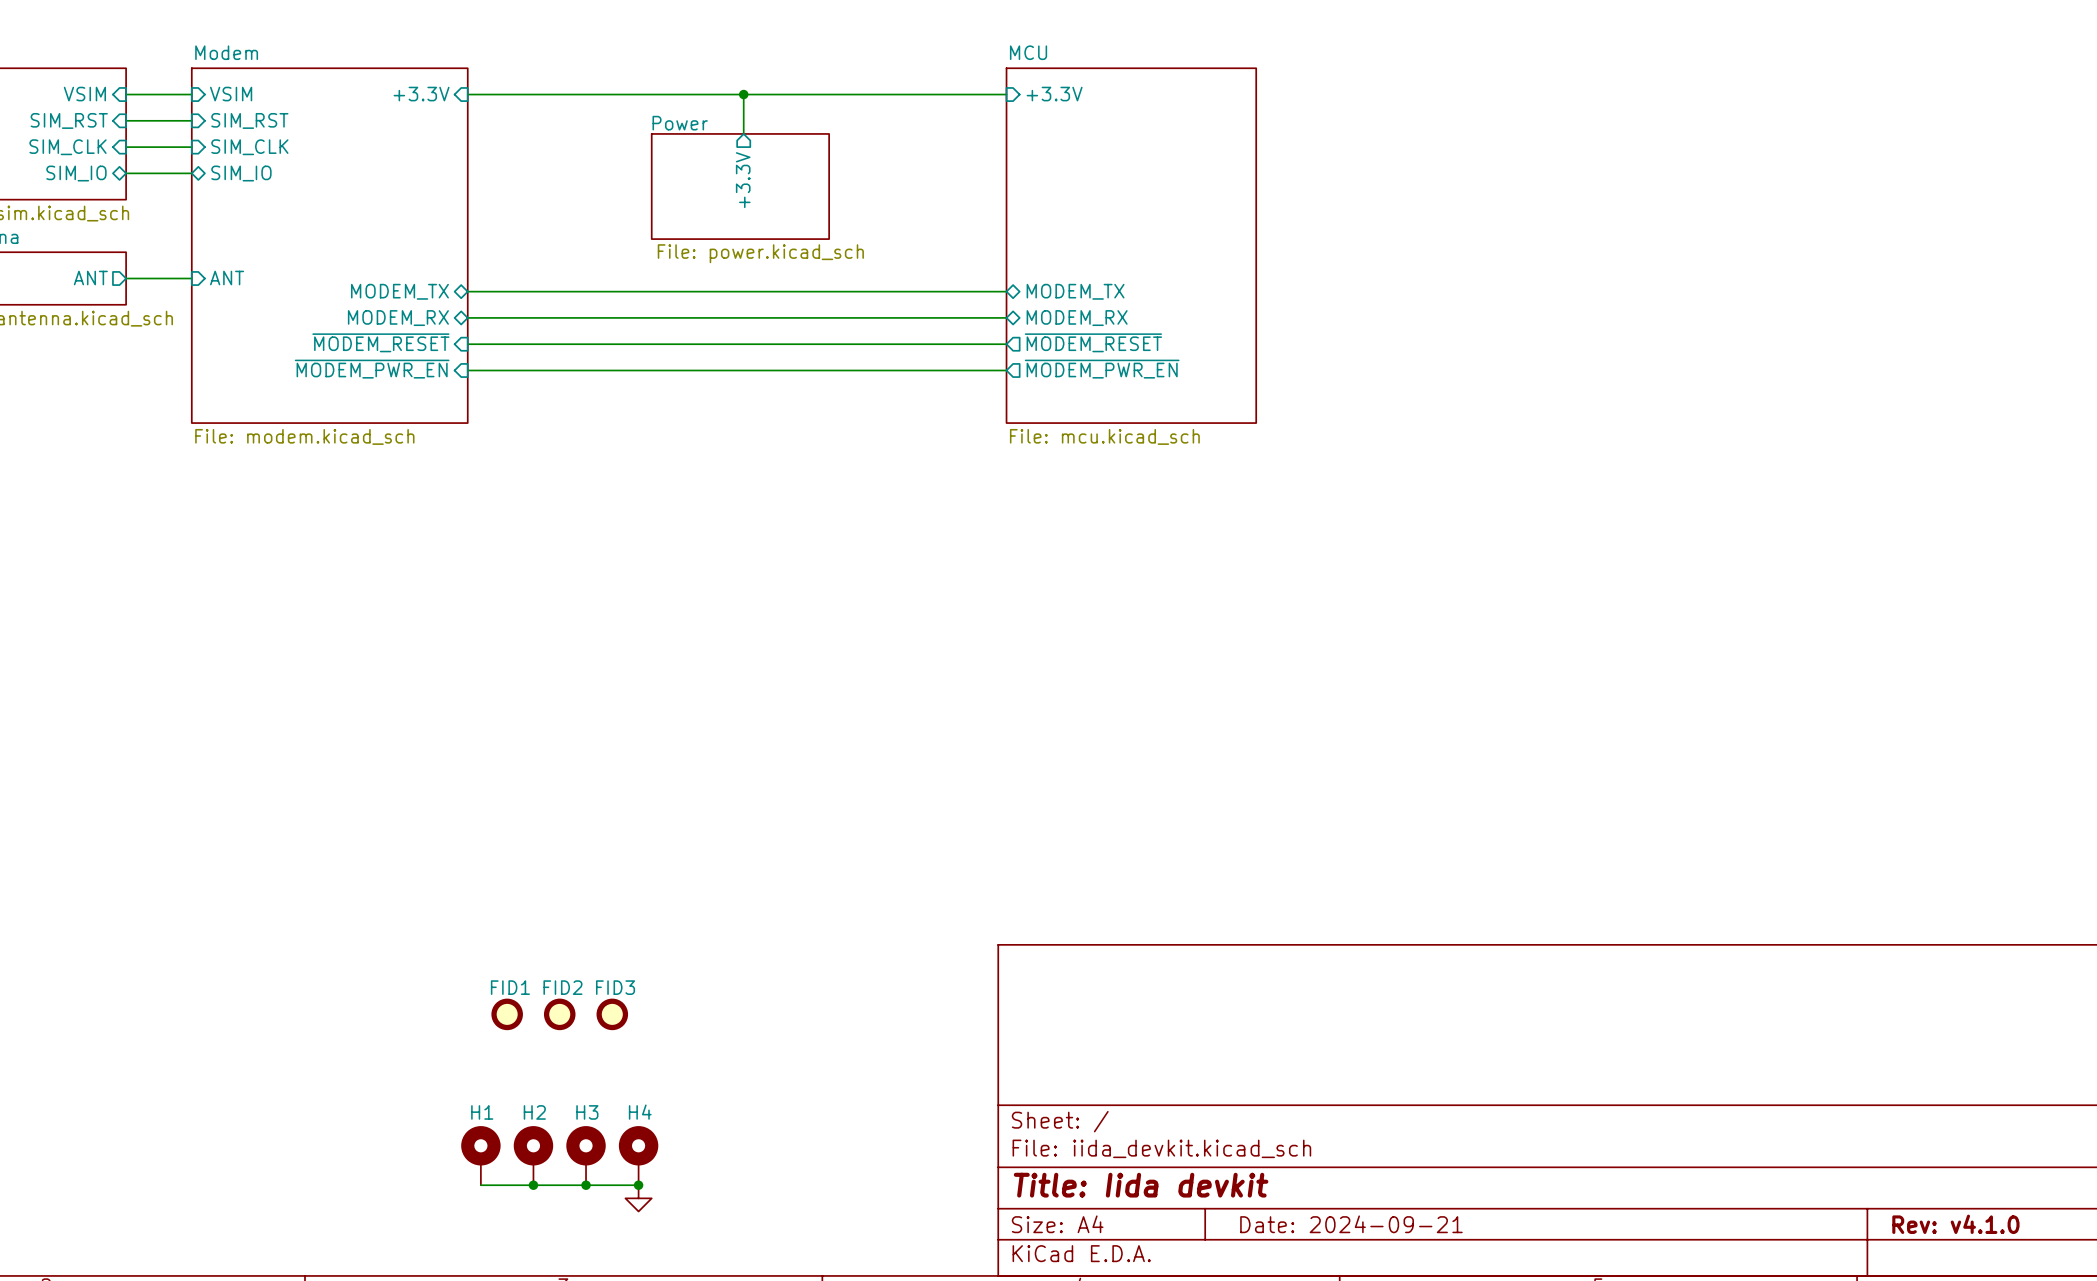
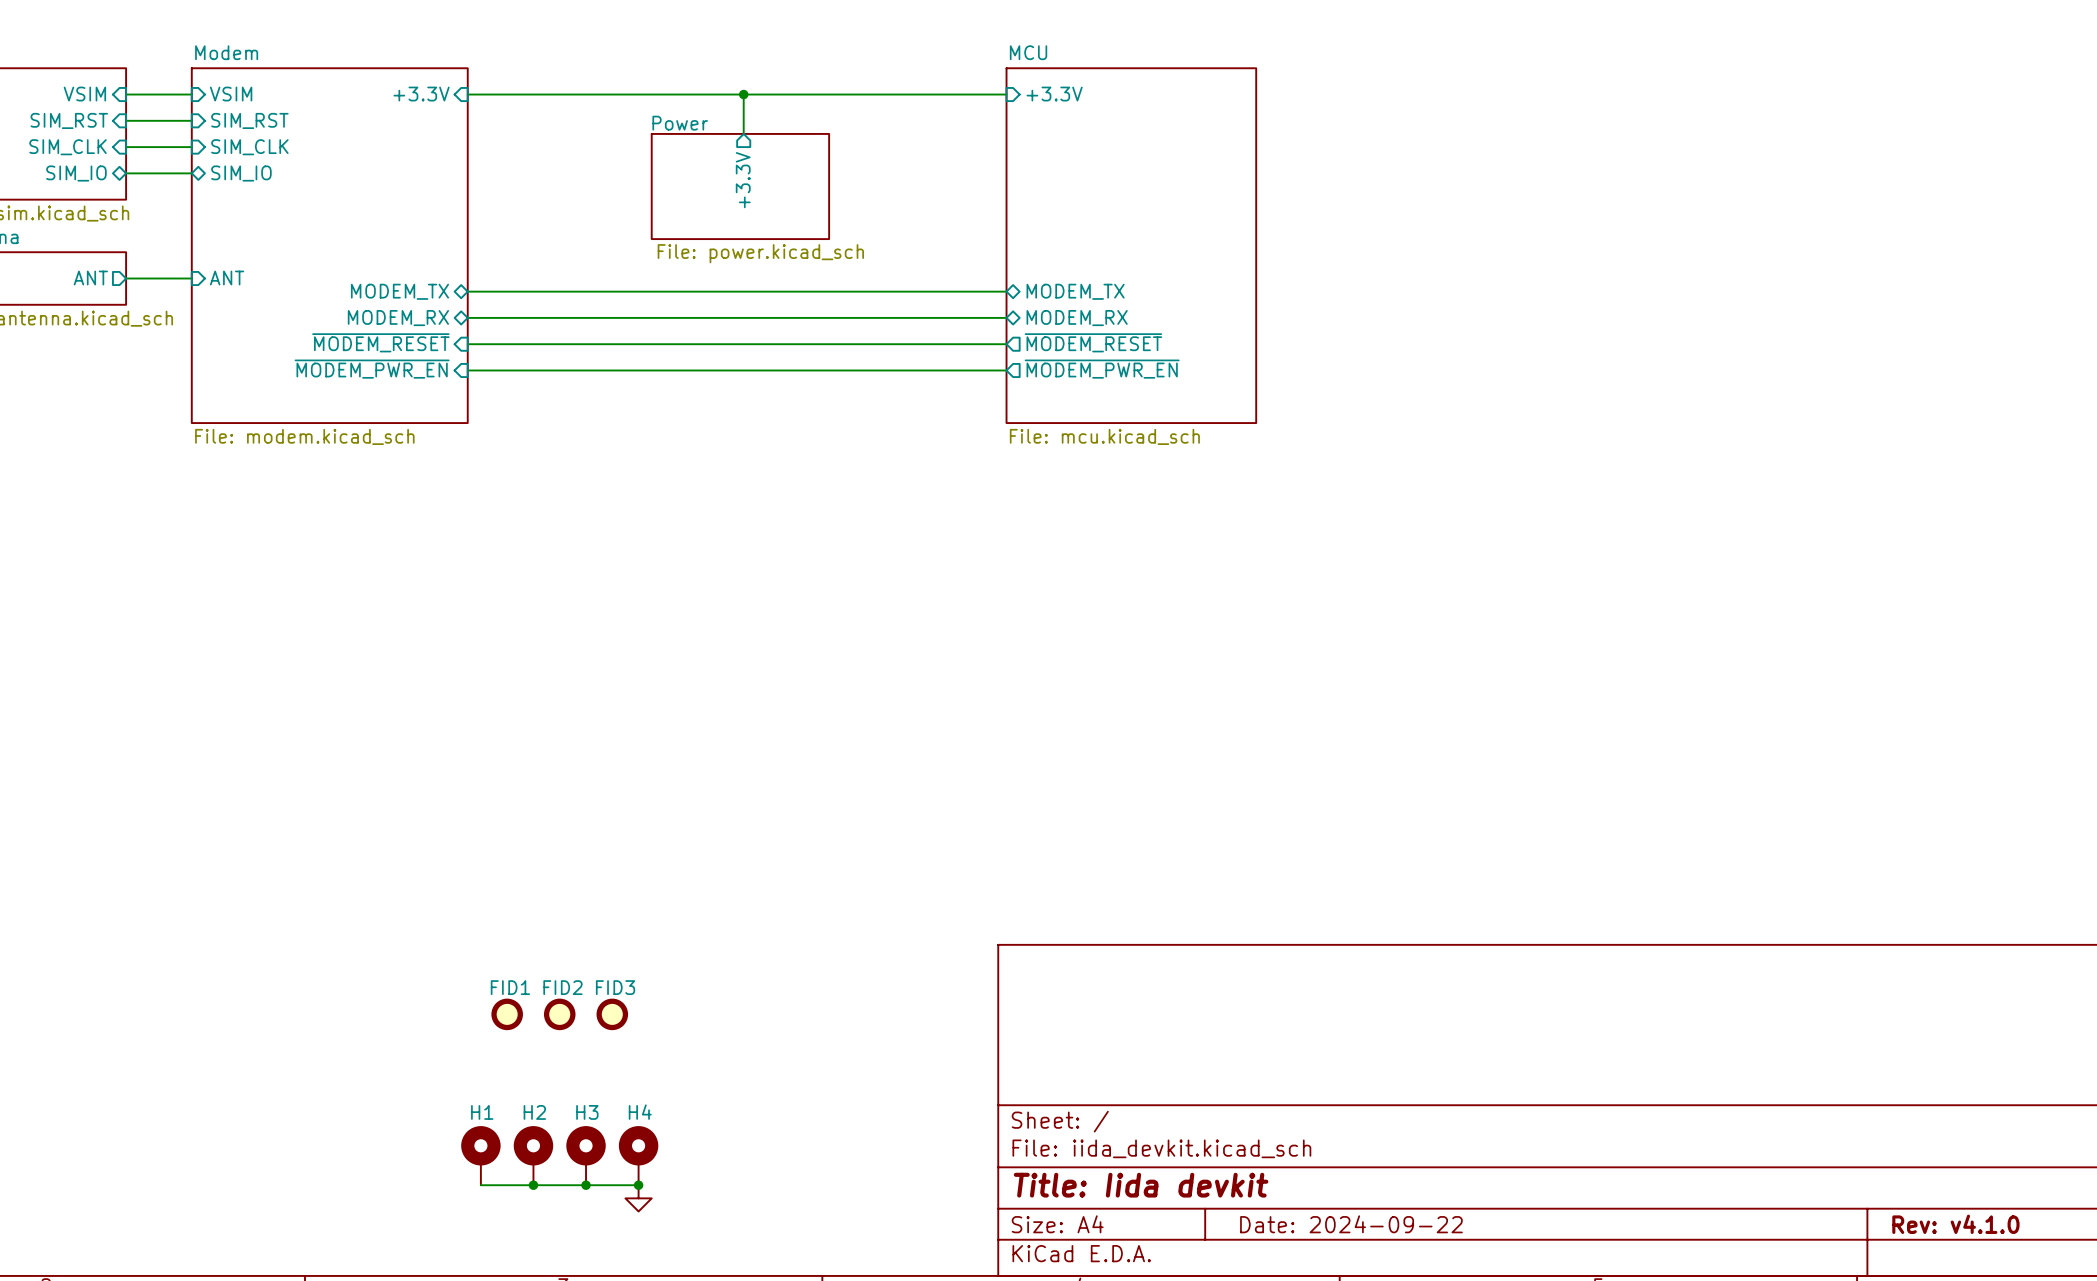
title block: Date: 2024-09-21 (1351, 1224) -> Date: 2024-09-22 (1351, 1224)

